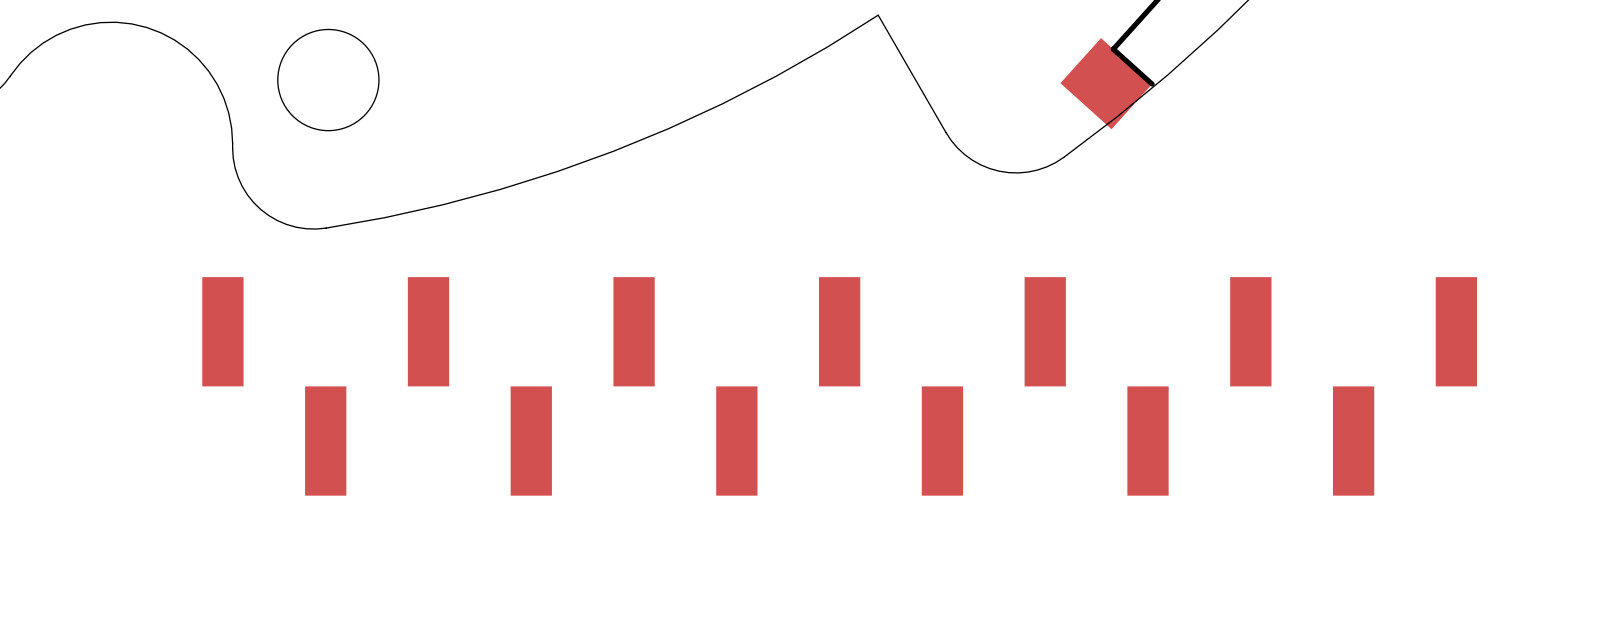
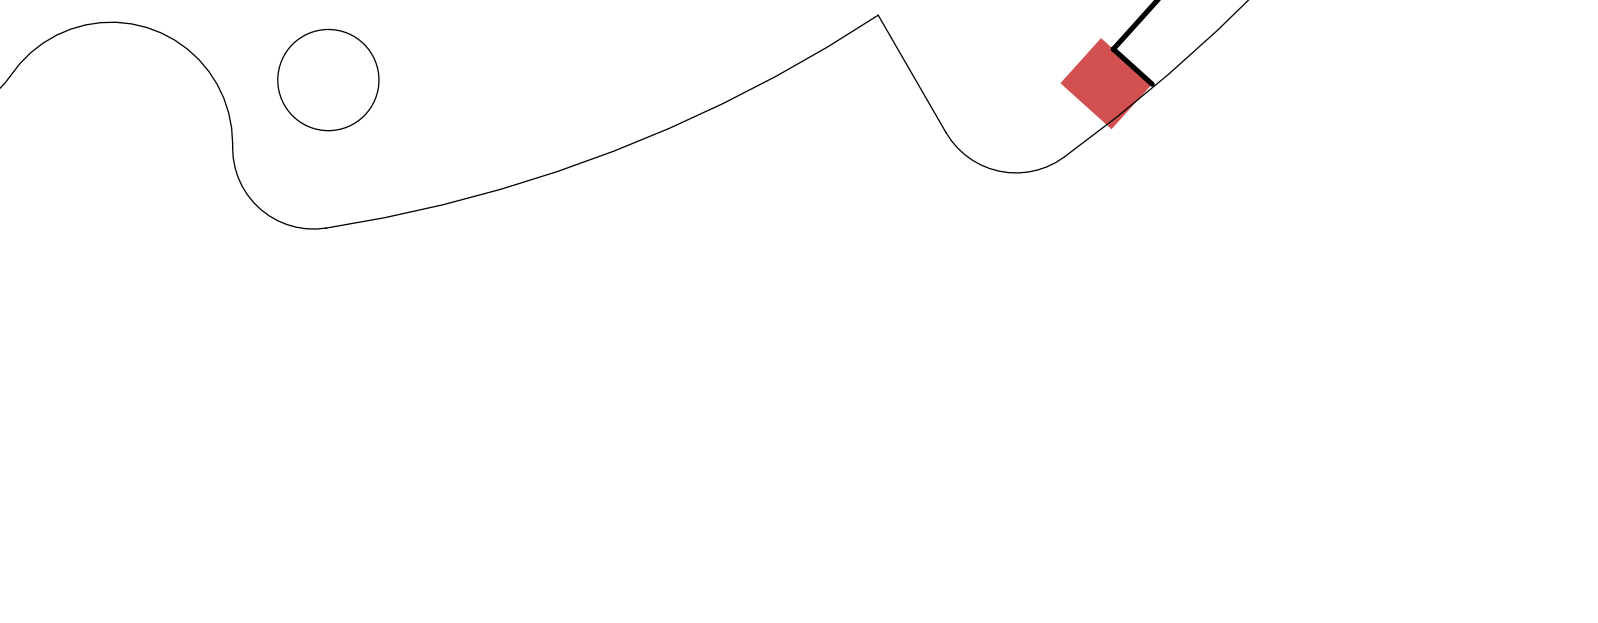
part: (839, 386) -> none

